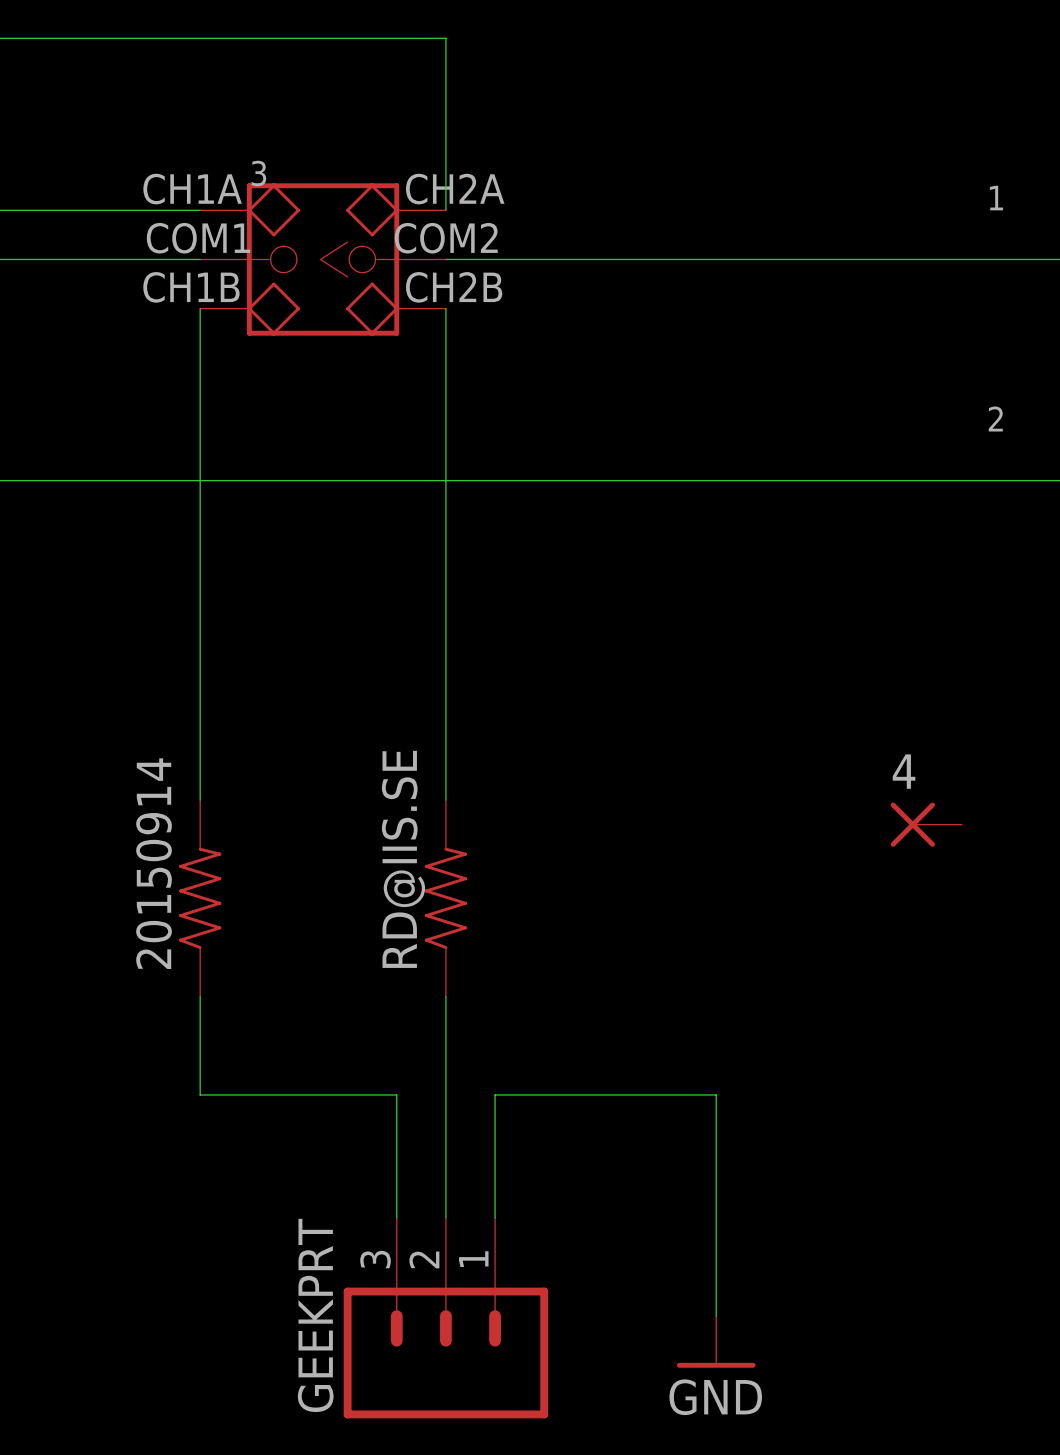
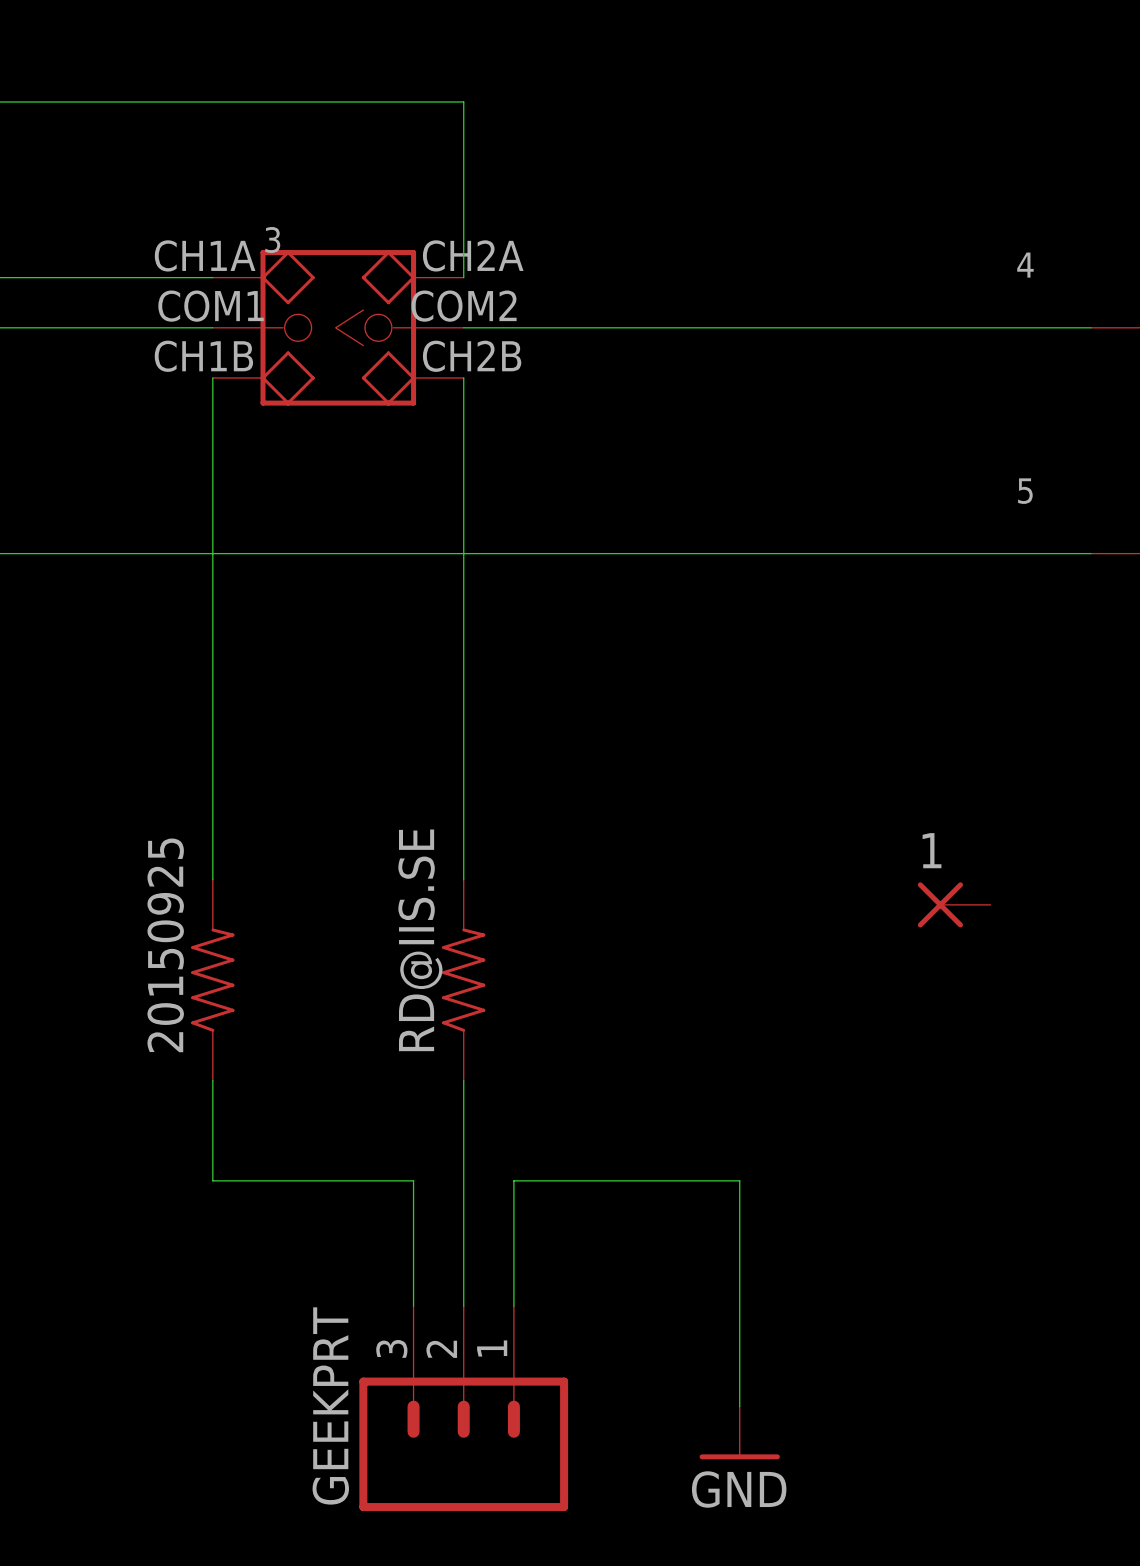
1 name: 1 (996, 198) -> 4 (1025, 265)
2 name: 2 (995, 418) -> 5 (1025, 491)
4 name: 4 (904, 771) -> 1 (932, 850)
20150914 name: 20150914 (154, 863) -> 20150925 (165, 945)

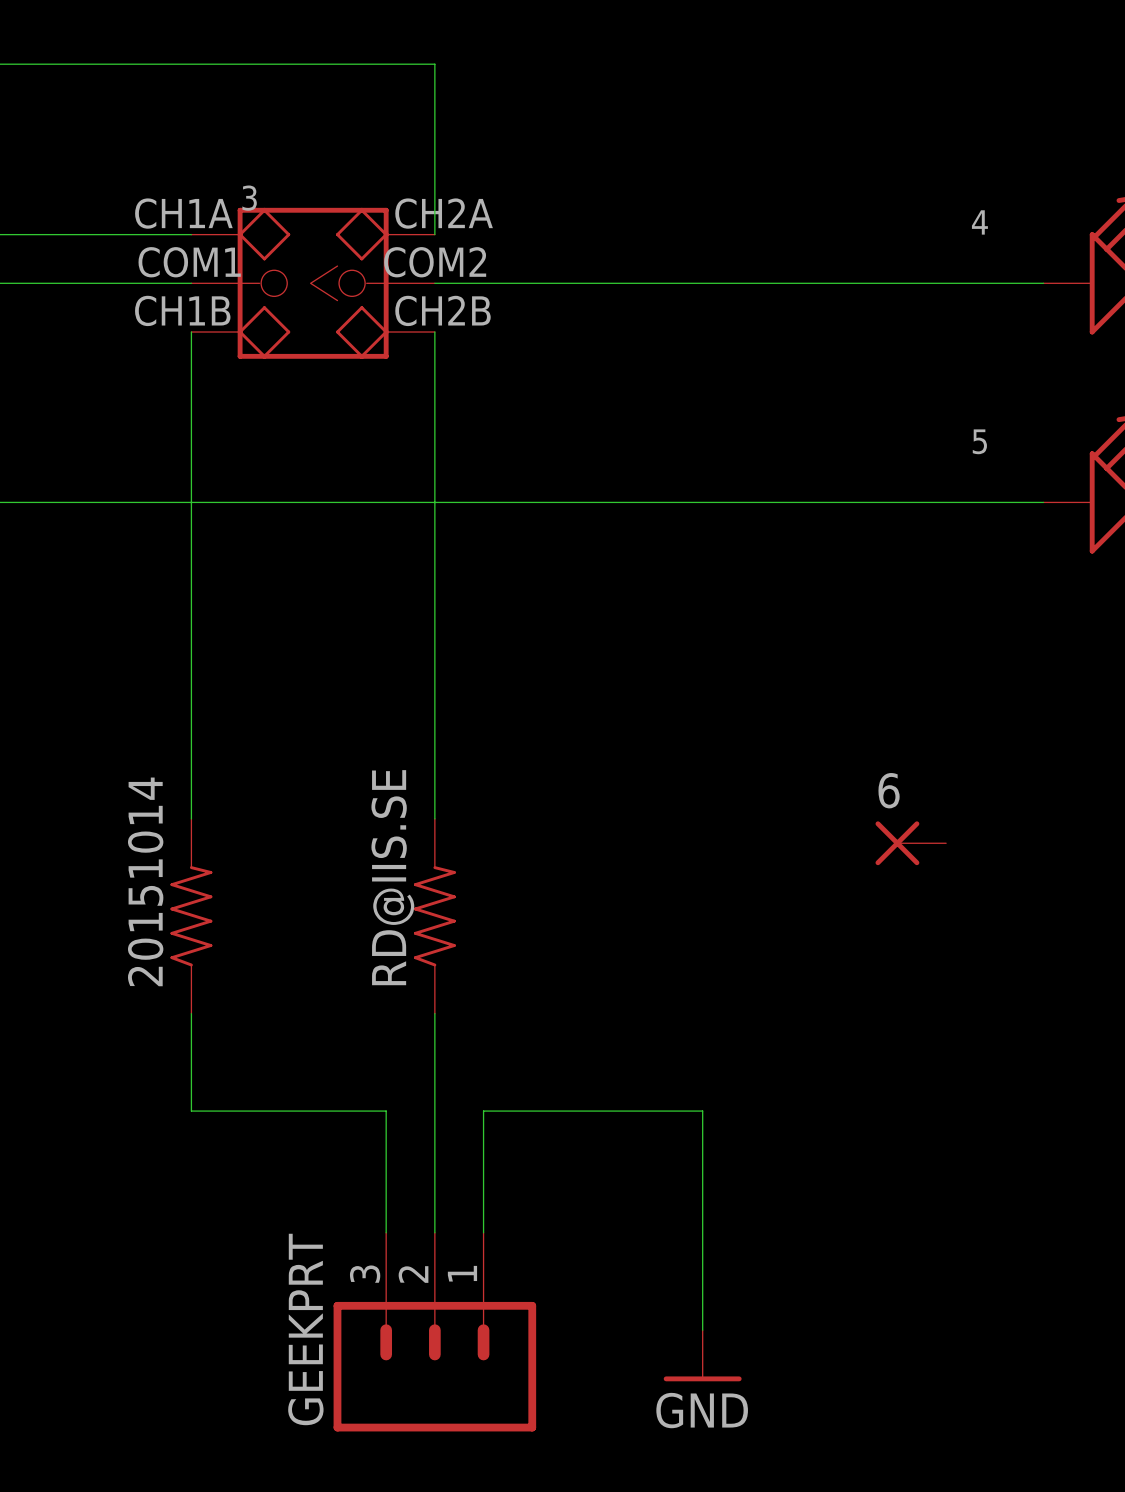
1 name: 1 (932, 850) -> 6 (889, 790)
20150925 name: 20150925 (165, 945) -> 20151014 (145, 881)

